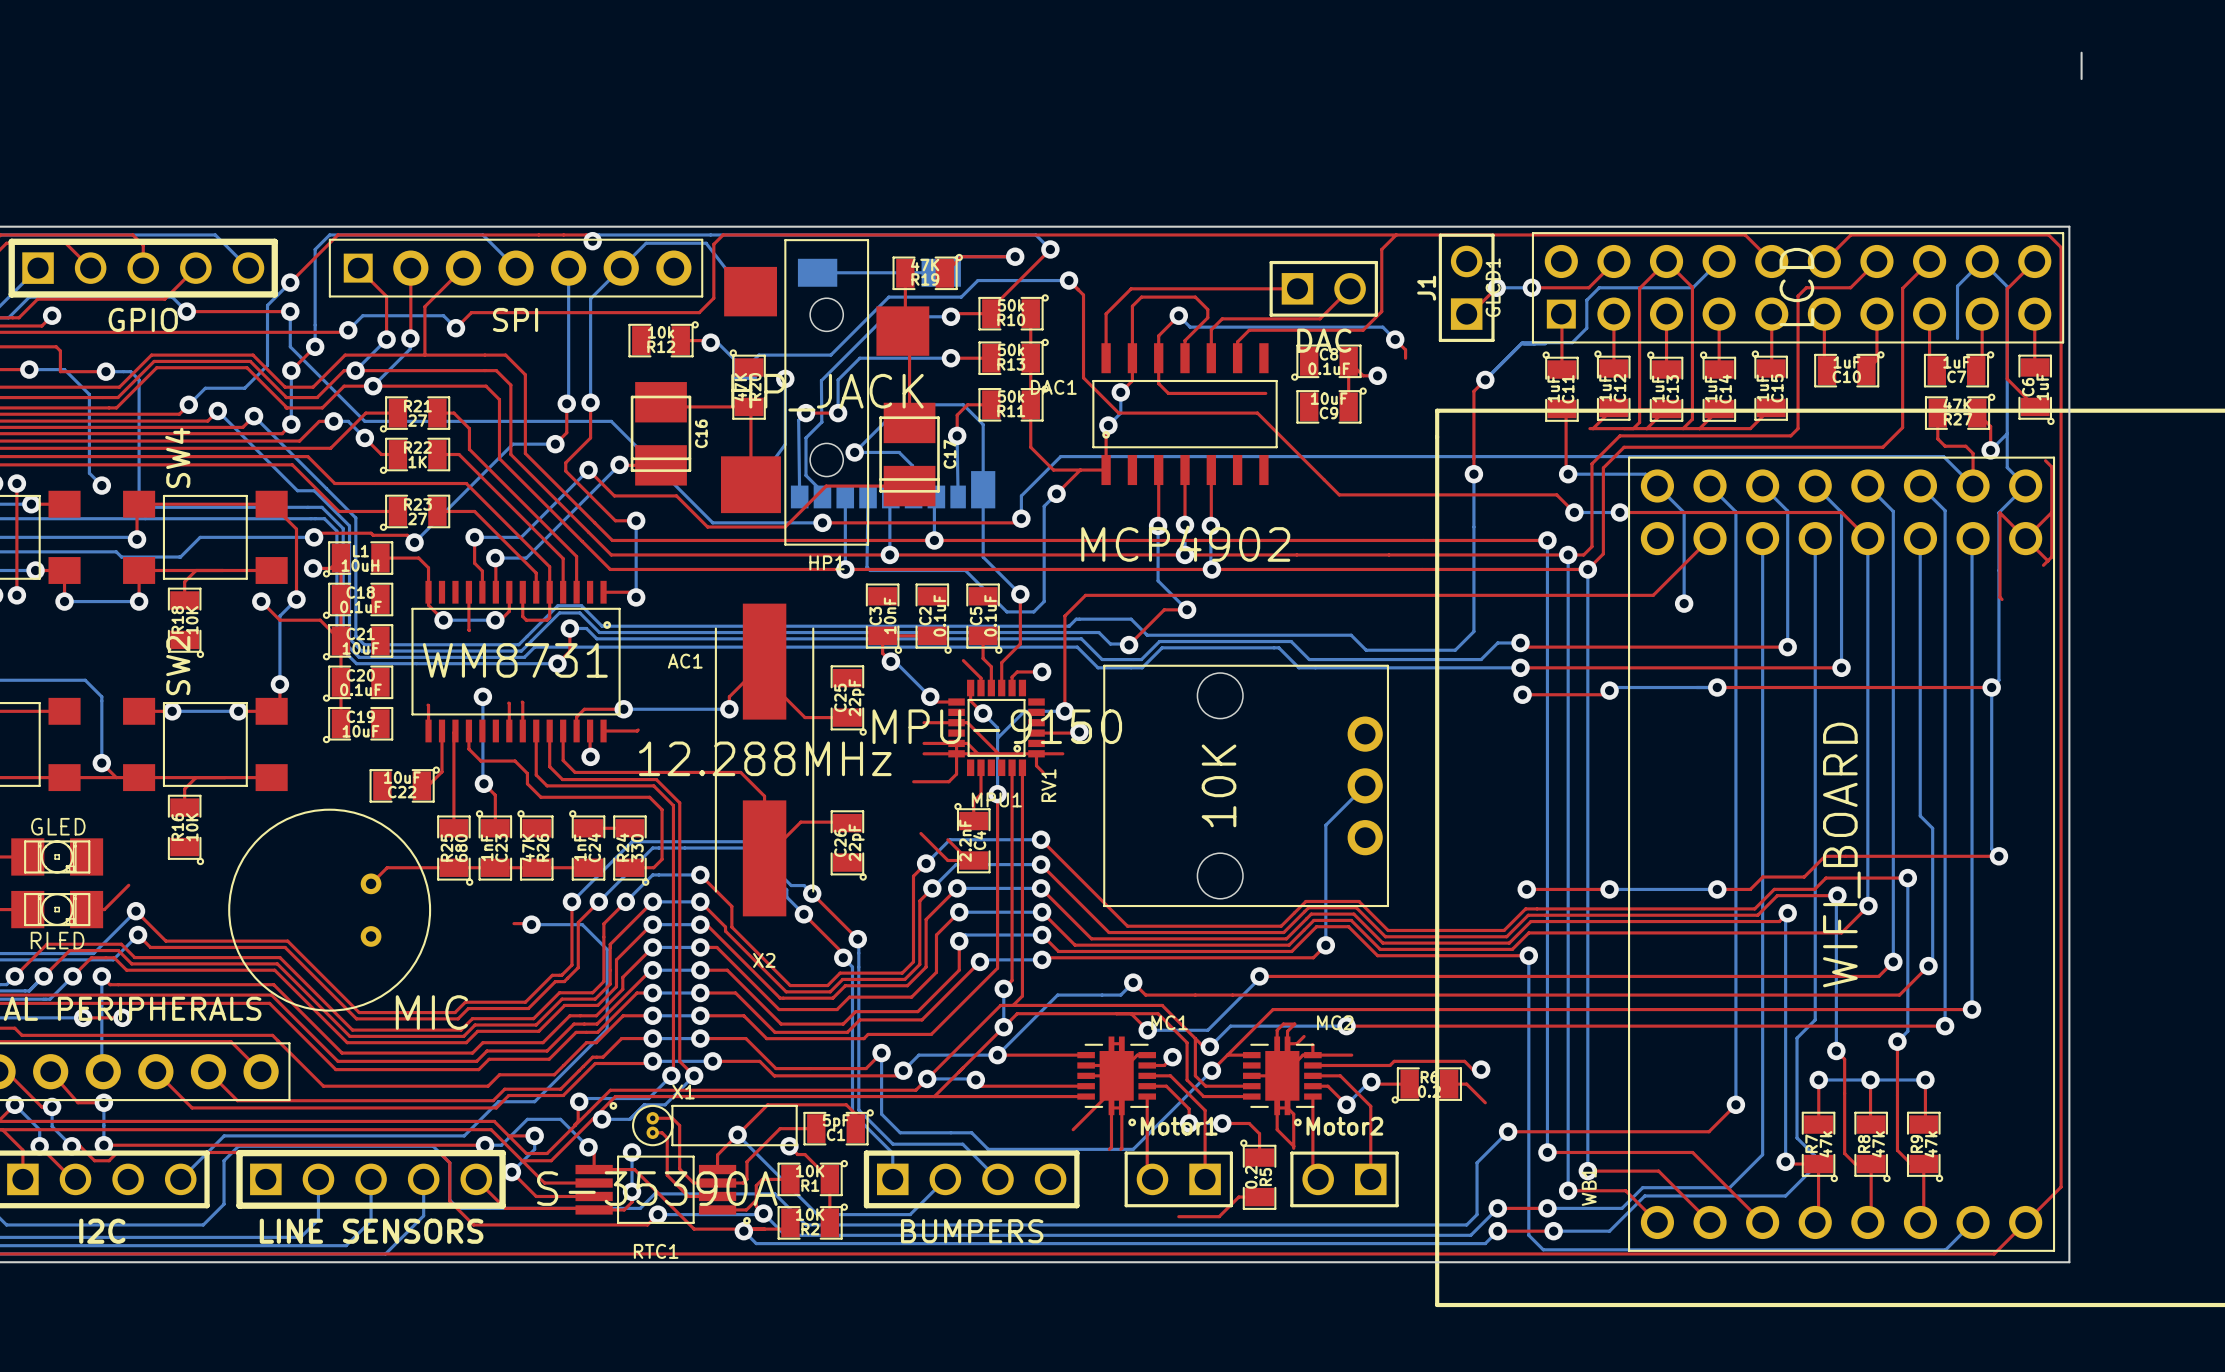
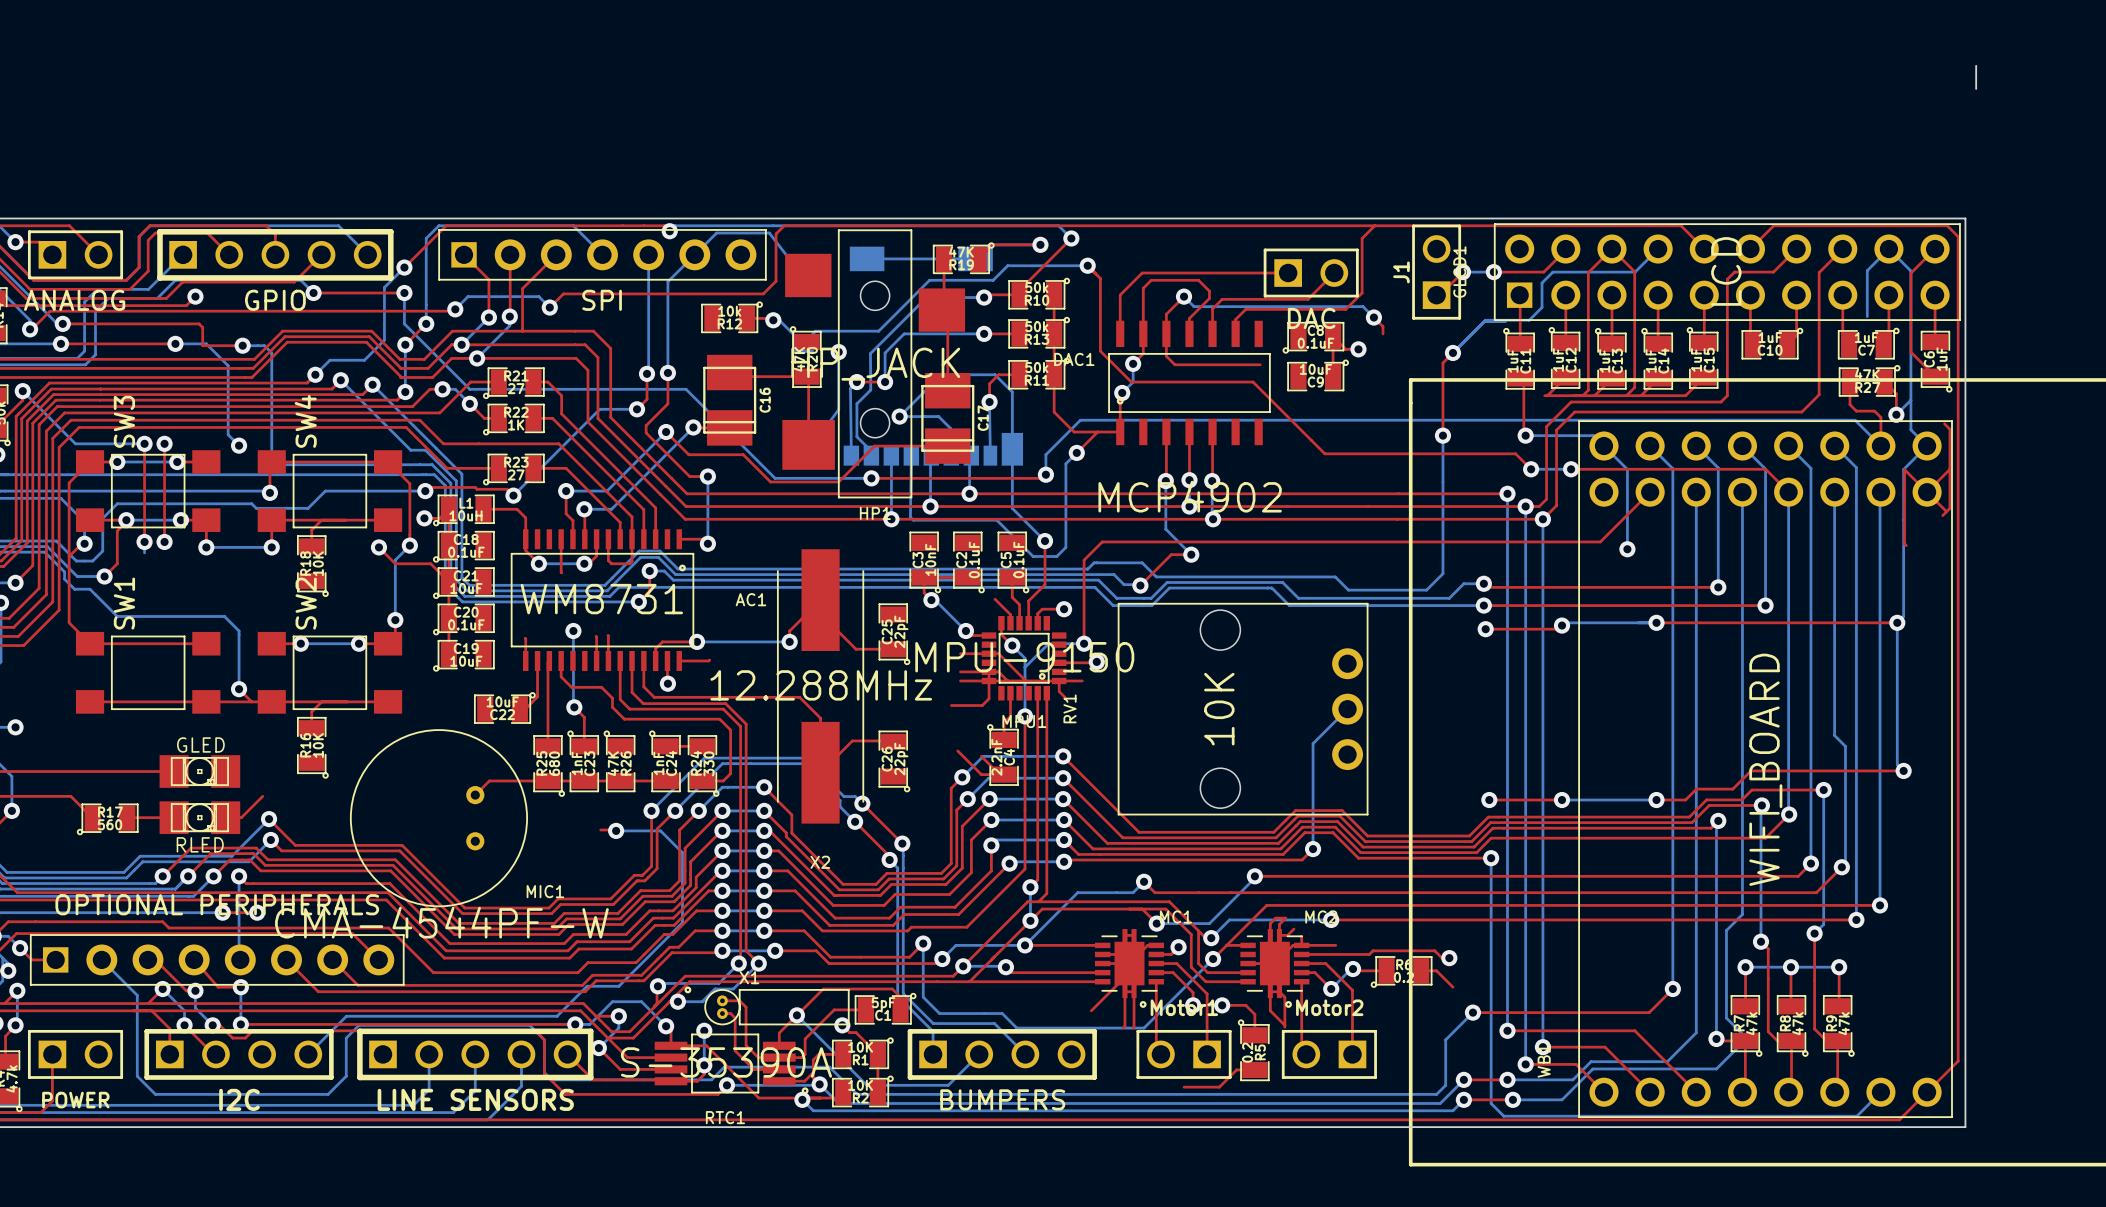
MIC1 name: none -> MIC1 (545, 891)
MIC1 value: MIC (431, 1012) -> CMA-4544PF-W (441, 922)

